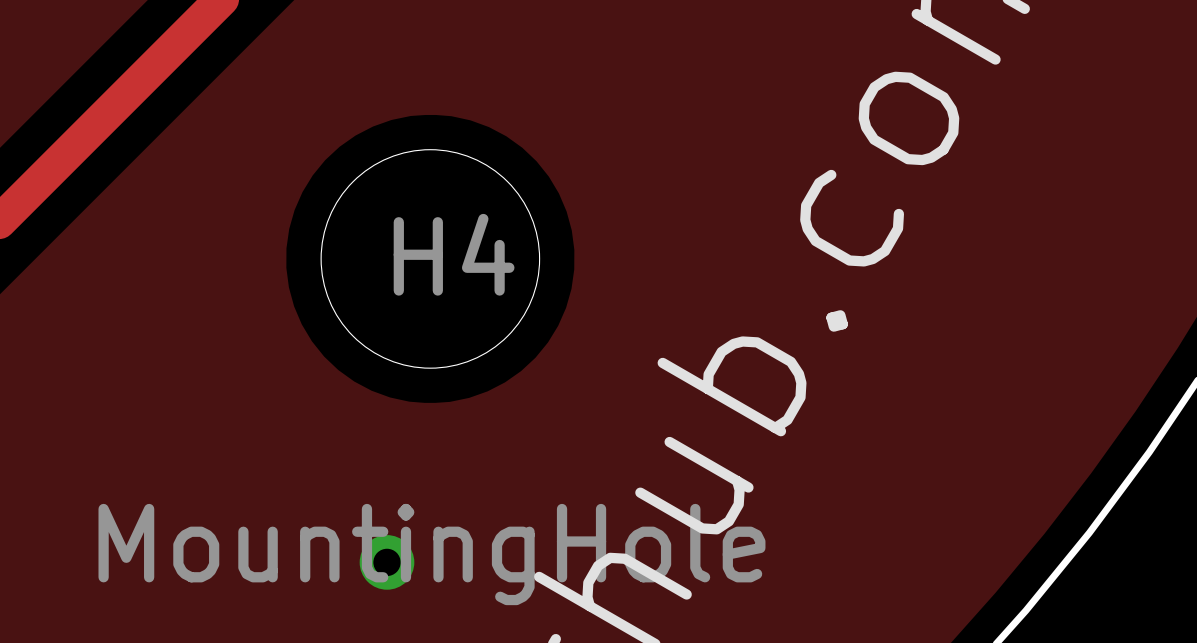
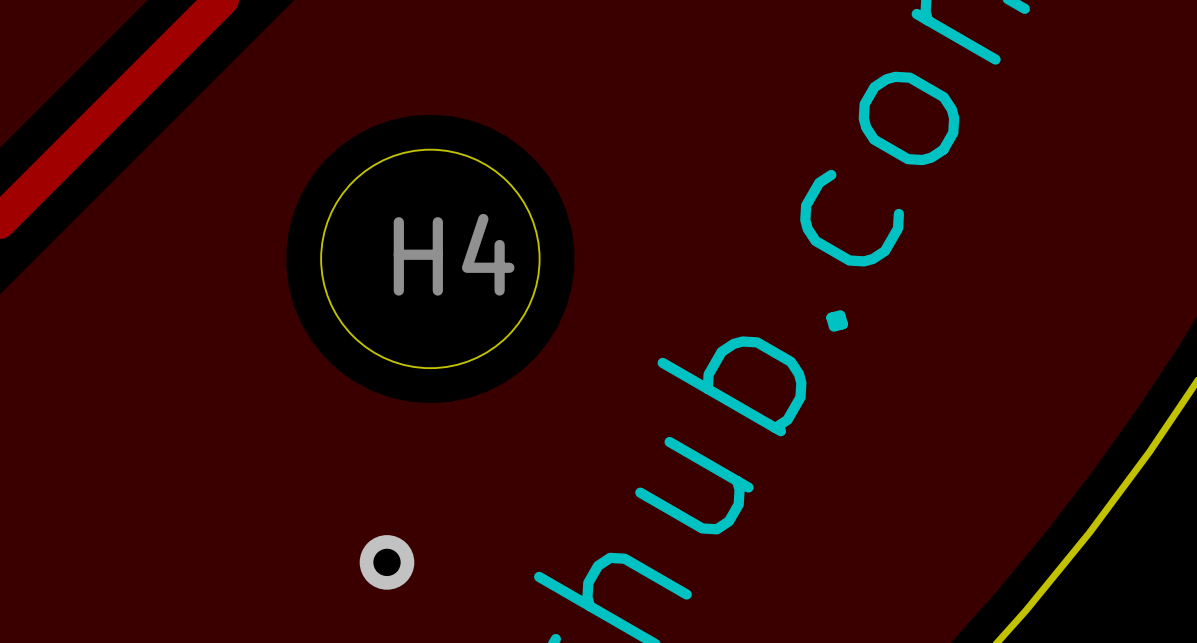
H4 value: MountingHole (431, 554) -> none

